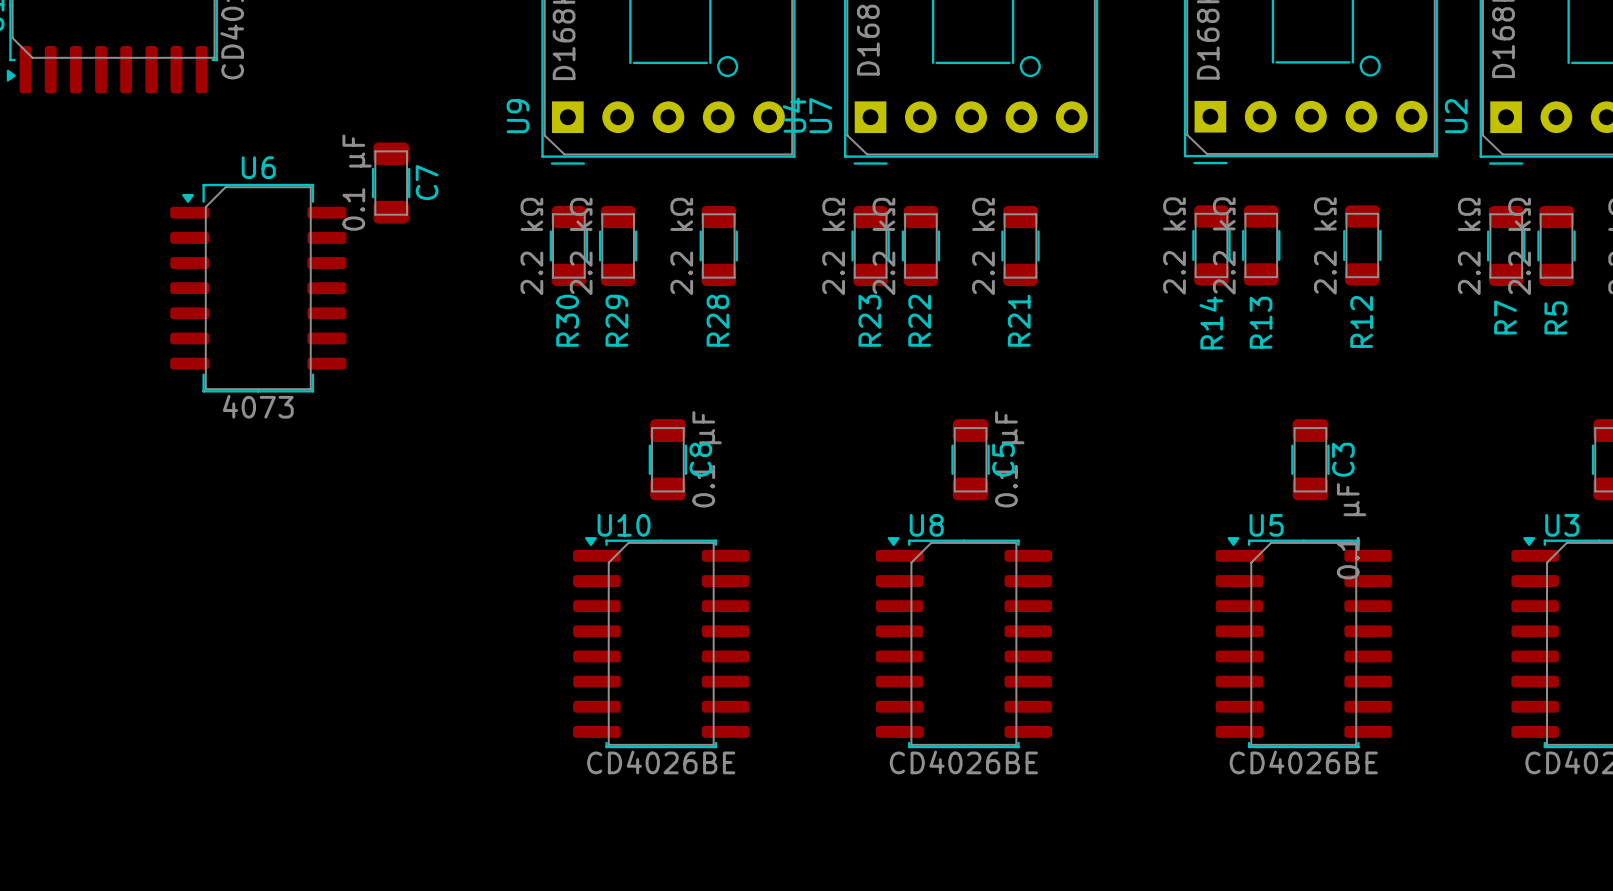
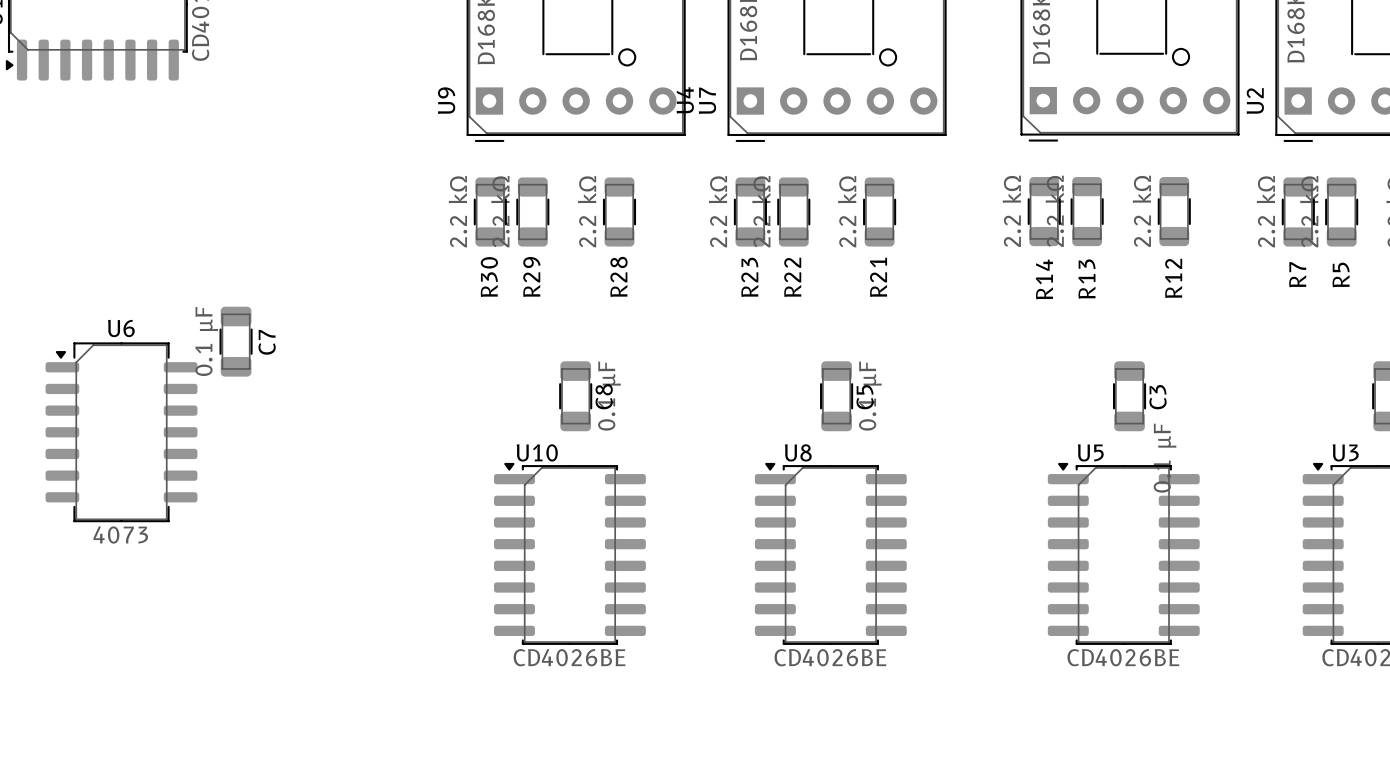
C7 position: (391, 183) -> (236, 341)
U6 position: (258, 288) -> (121, 432)

